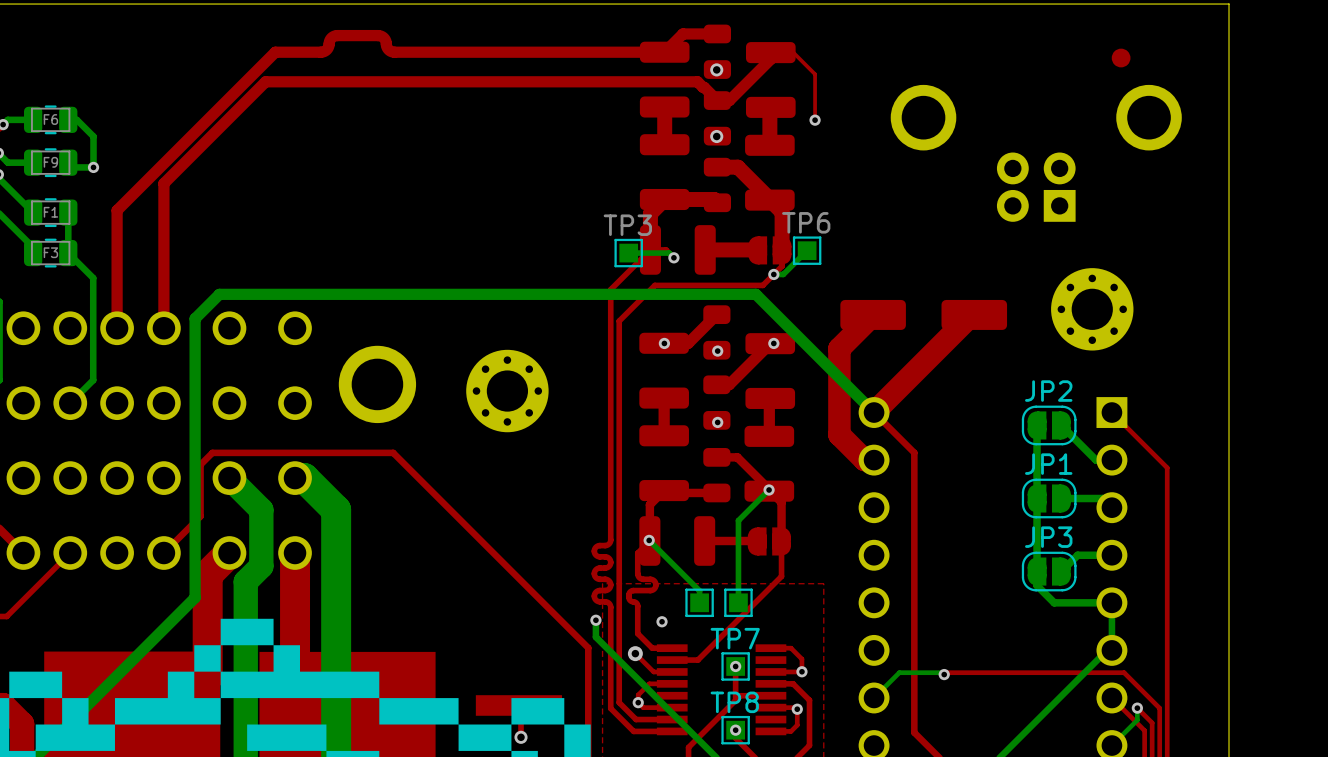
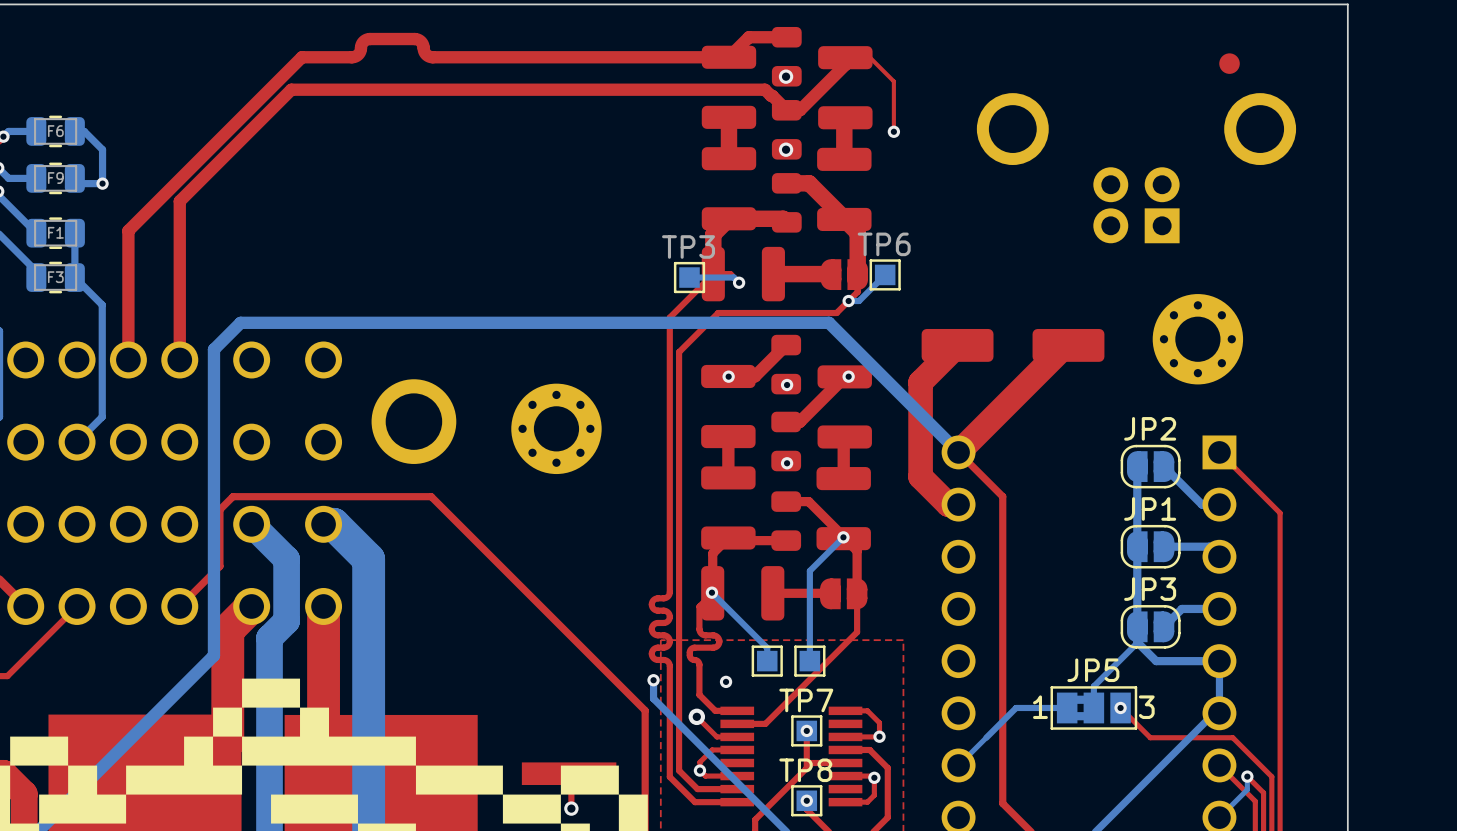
bottom track: none -> (1137, 626) (1137, 642) (1093, 686) (1093, 707)
JP5: none -> (1093, 707)
bottom track: (899, 672) (942, 672) (944, 674) -> (986, 737) (1016, 707) (1067, 707)
top track: (1048, 672) (946, 672) (944, 674) -> (1150, 737) (1120, 707)
via position: (944, 674) -> (1120, 707)

